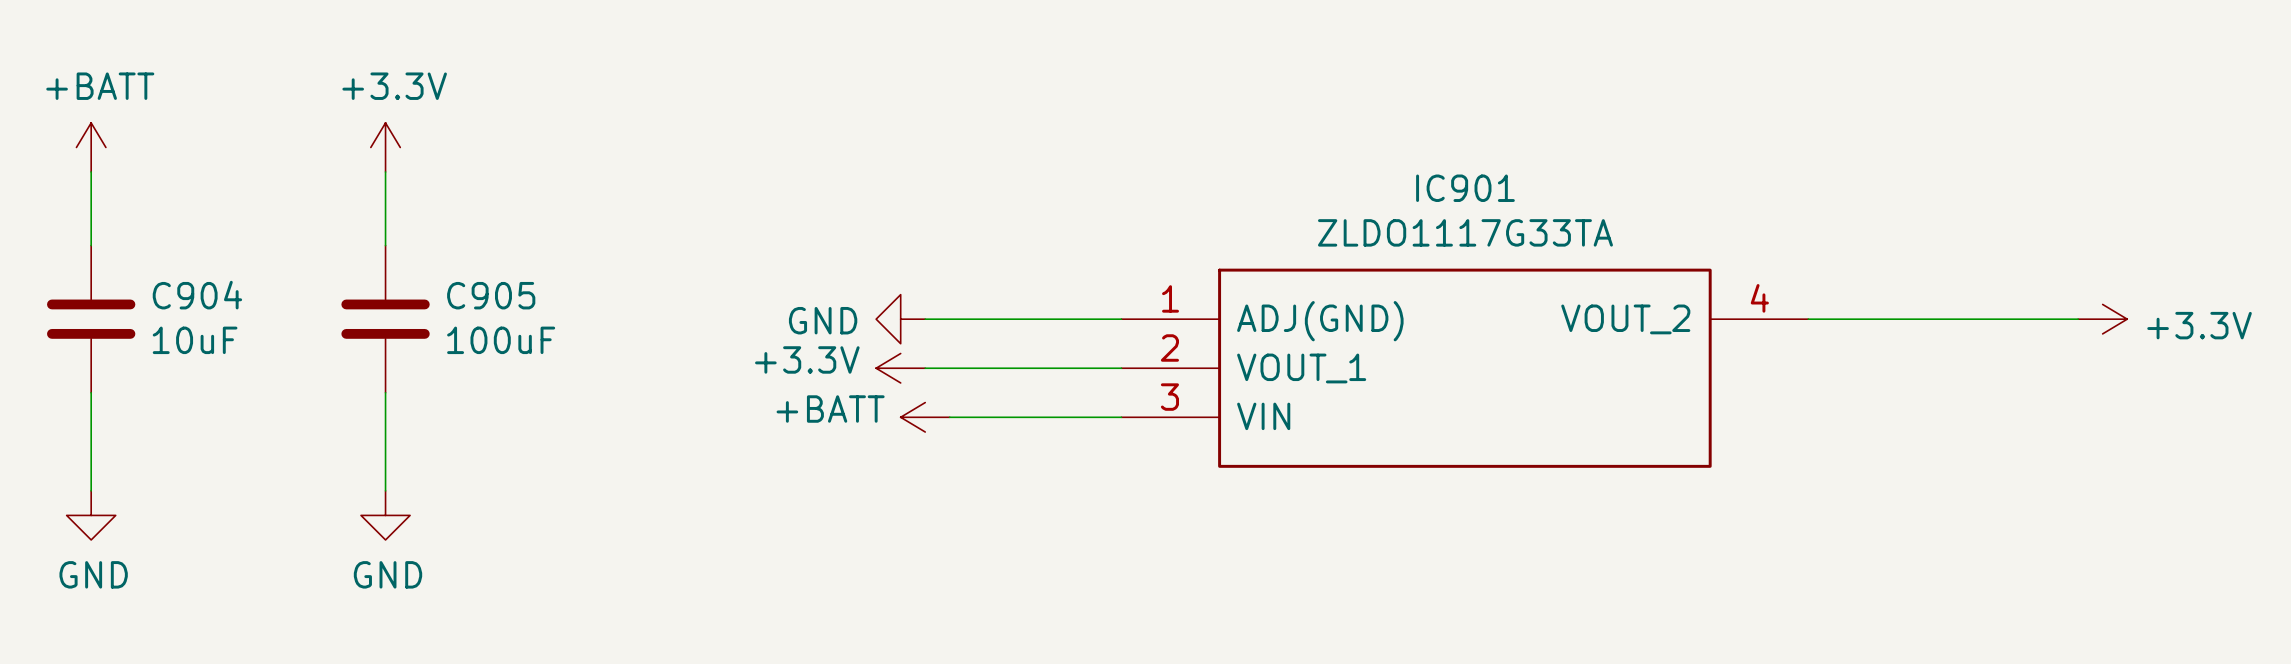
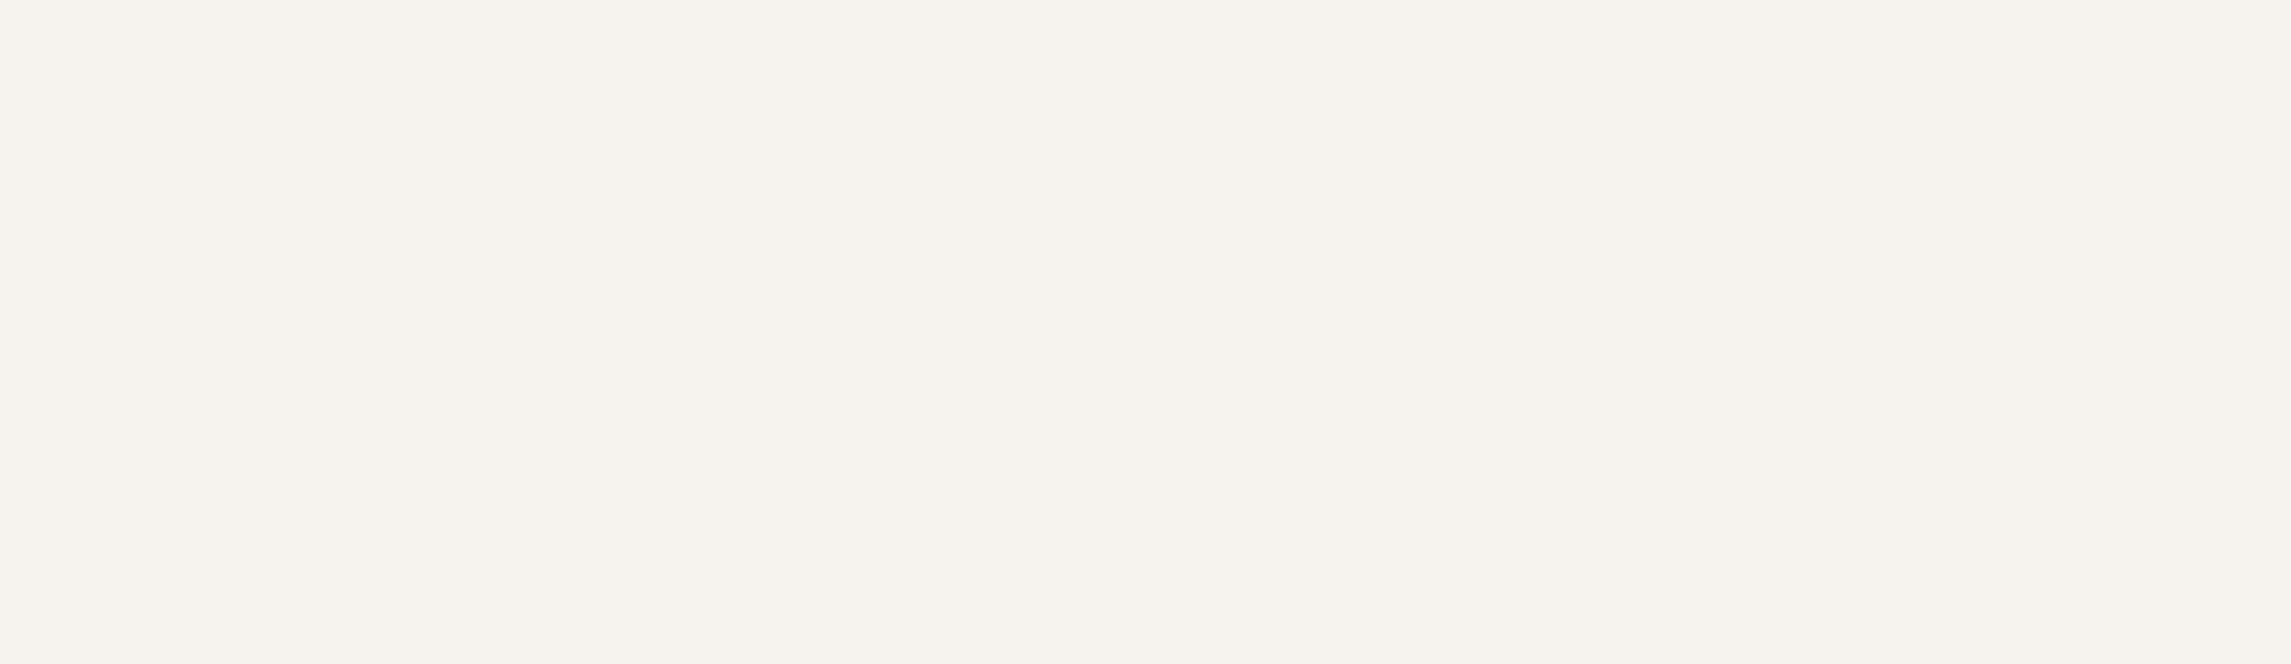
power symbol: +BATT (91, 147) -> none
power symbol: +3.3V (385, 147) -> none
wire: (91, 171) (91, 245) -> none
wire: (385, 171) (385, 245) -> none
C904: 10uF (91, 319) -> none
C905: 100uF (385, 319) -> none
power symbol: GND (900, 319) -> none
wire: (925, 319) (1121, 319) -> none
wire: (1808, 319) (2078, 319) -> none
power symbol: +3.3V (2102, 319) -> none
power symbol: +3.3V (900, 368) -> none
wire: (925, 368) (1121, 368) -> none
IC901: ZLDO1117G33TA (1464, 368) -> none
wire: (91, 392) (91, 490) -> none
wire: (385, 392) (385, 490) -> none
power symbol: +BATT (925, 417) -> none
wire: (949, 417) (1121, 417) -> none
power symbol: GND (91, 515) -> none
power symbol: GND (385, 515) -> none

